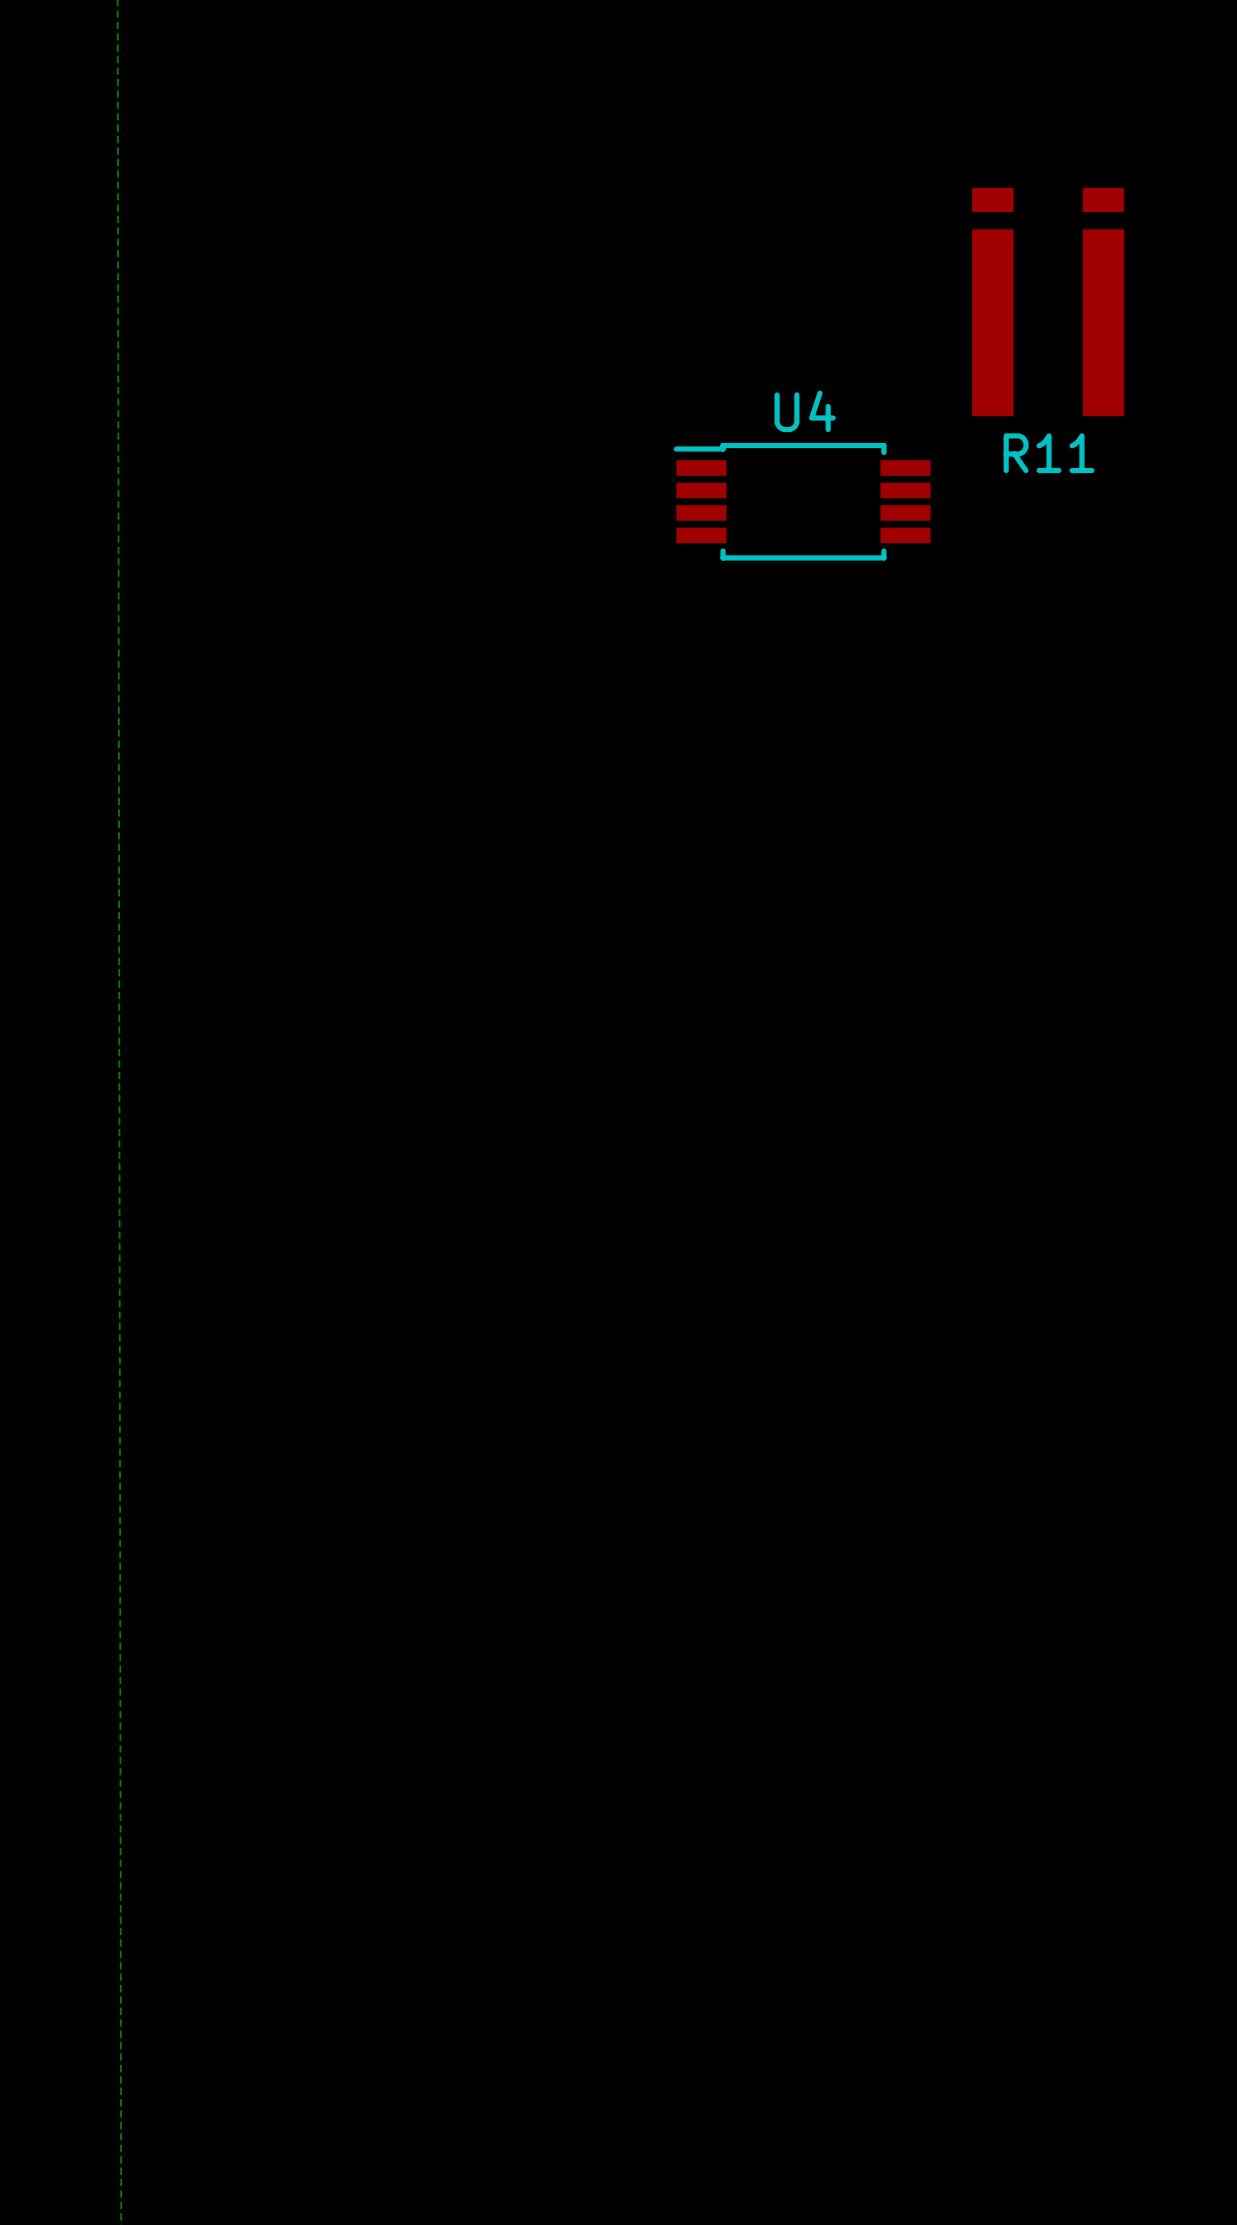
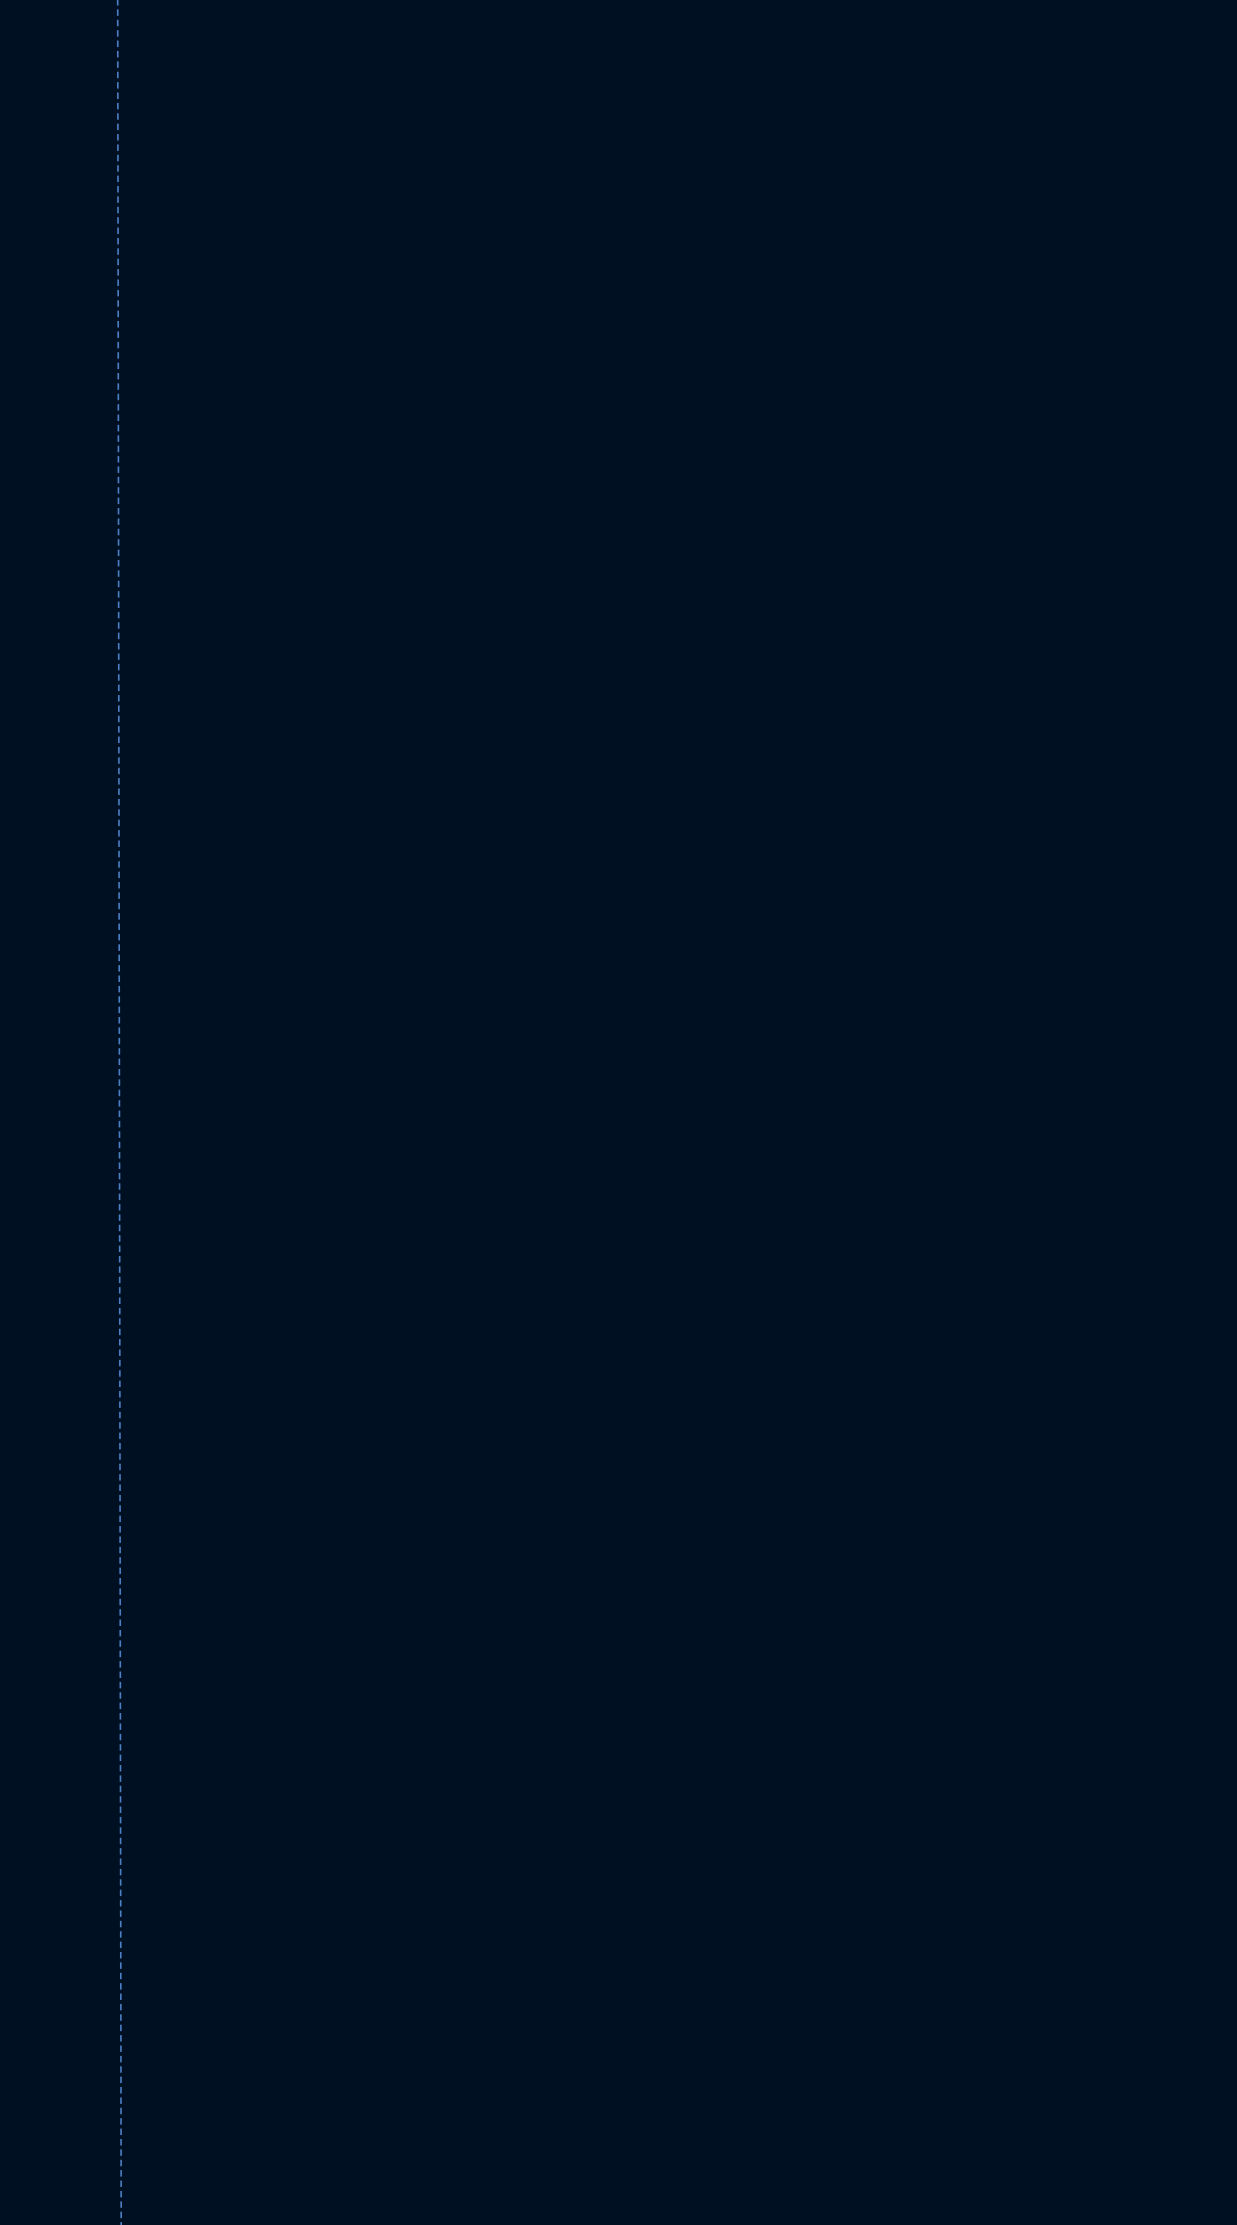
R11: (1048, 301) -> none
U4: (802, 501) -> none

